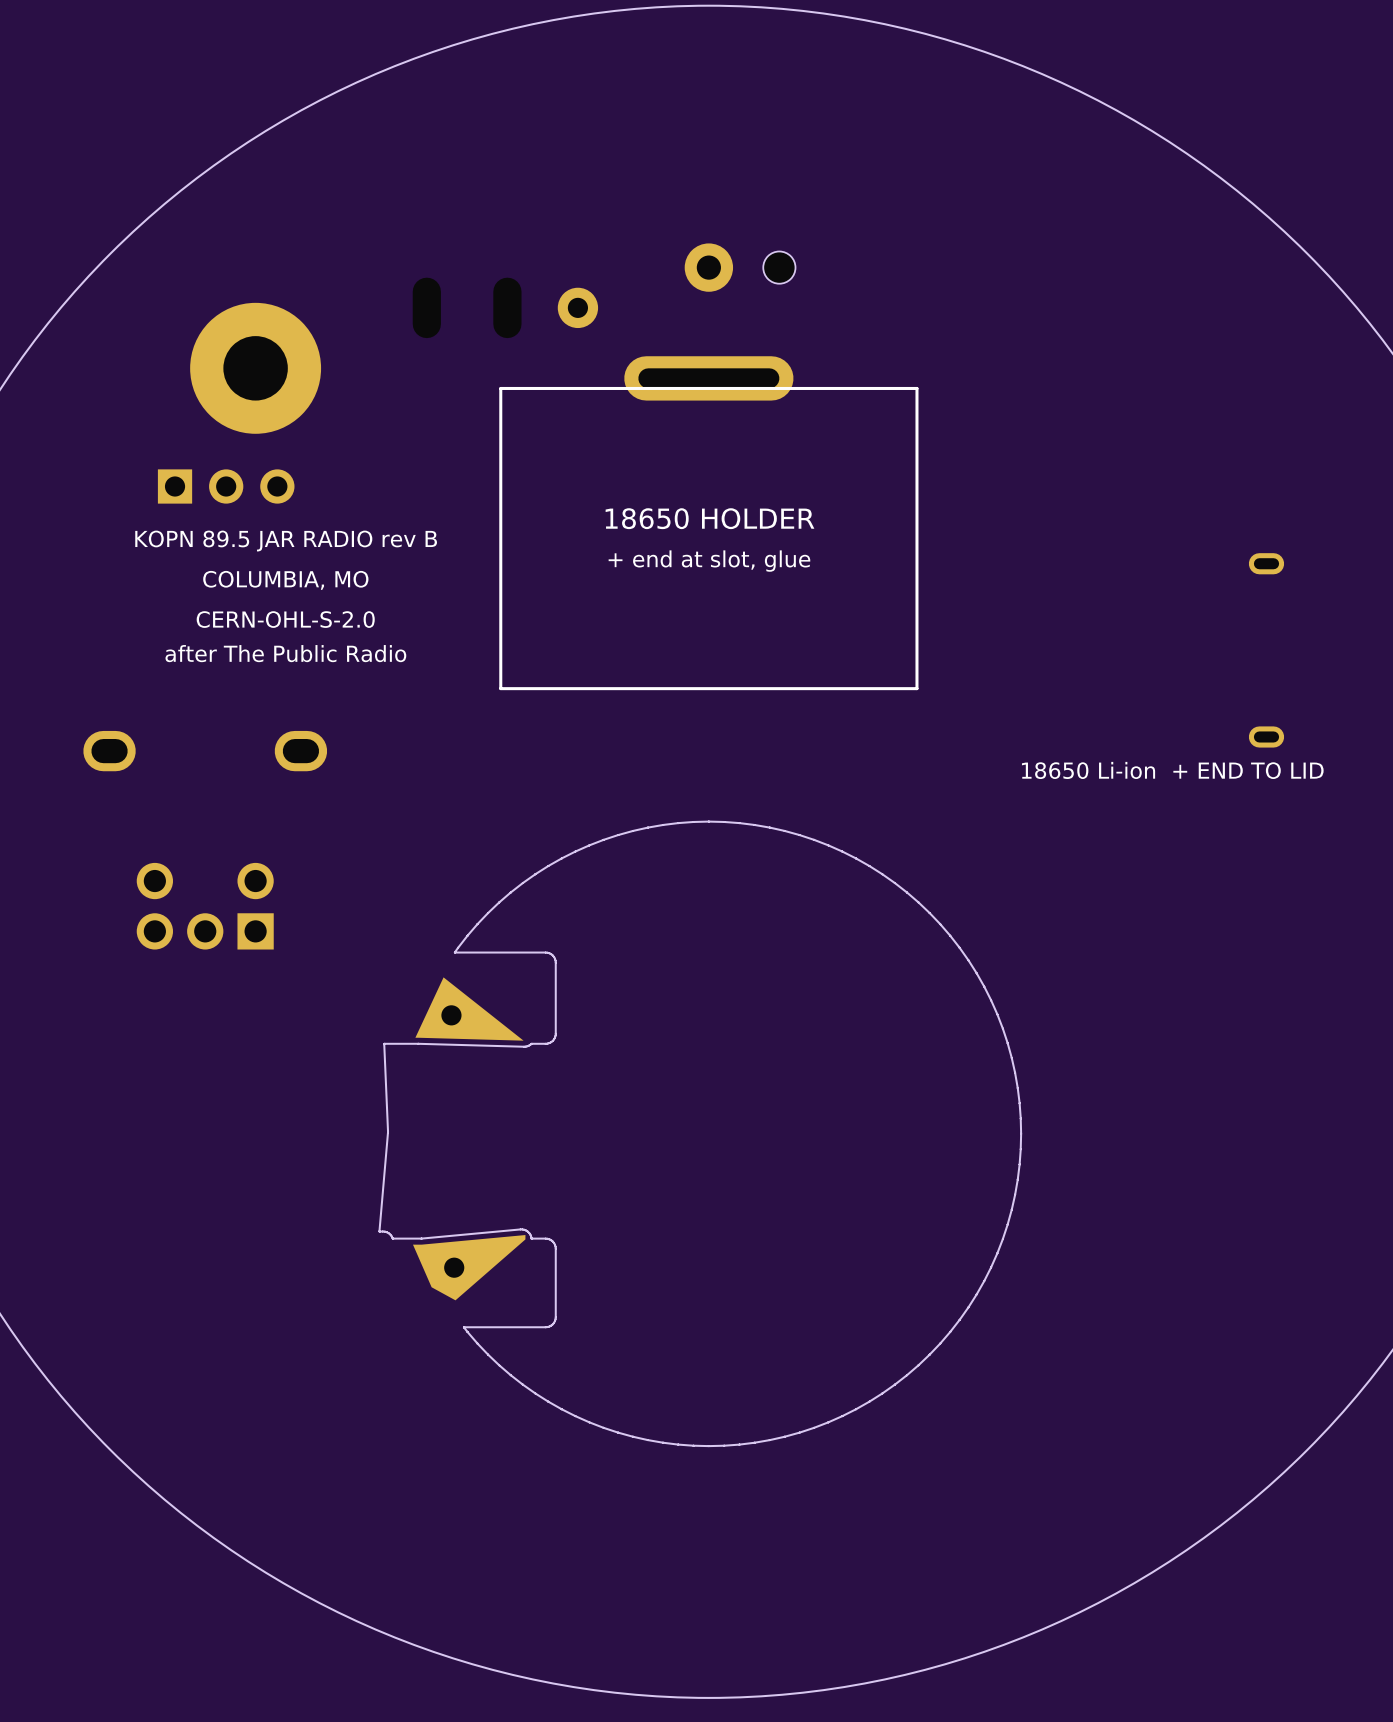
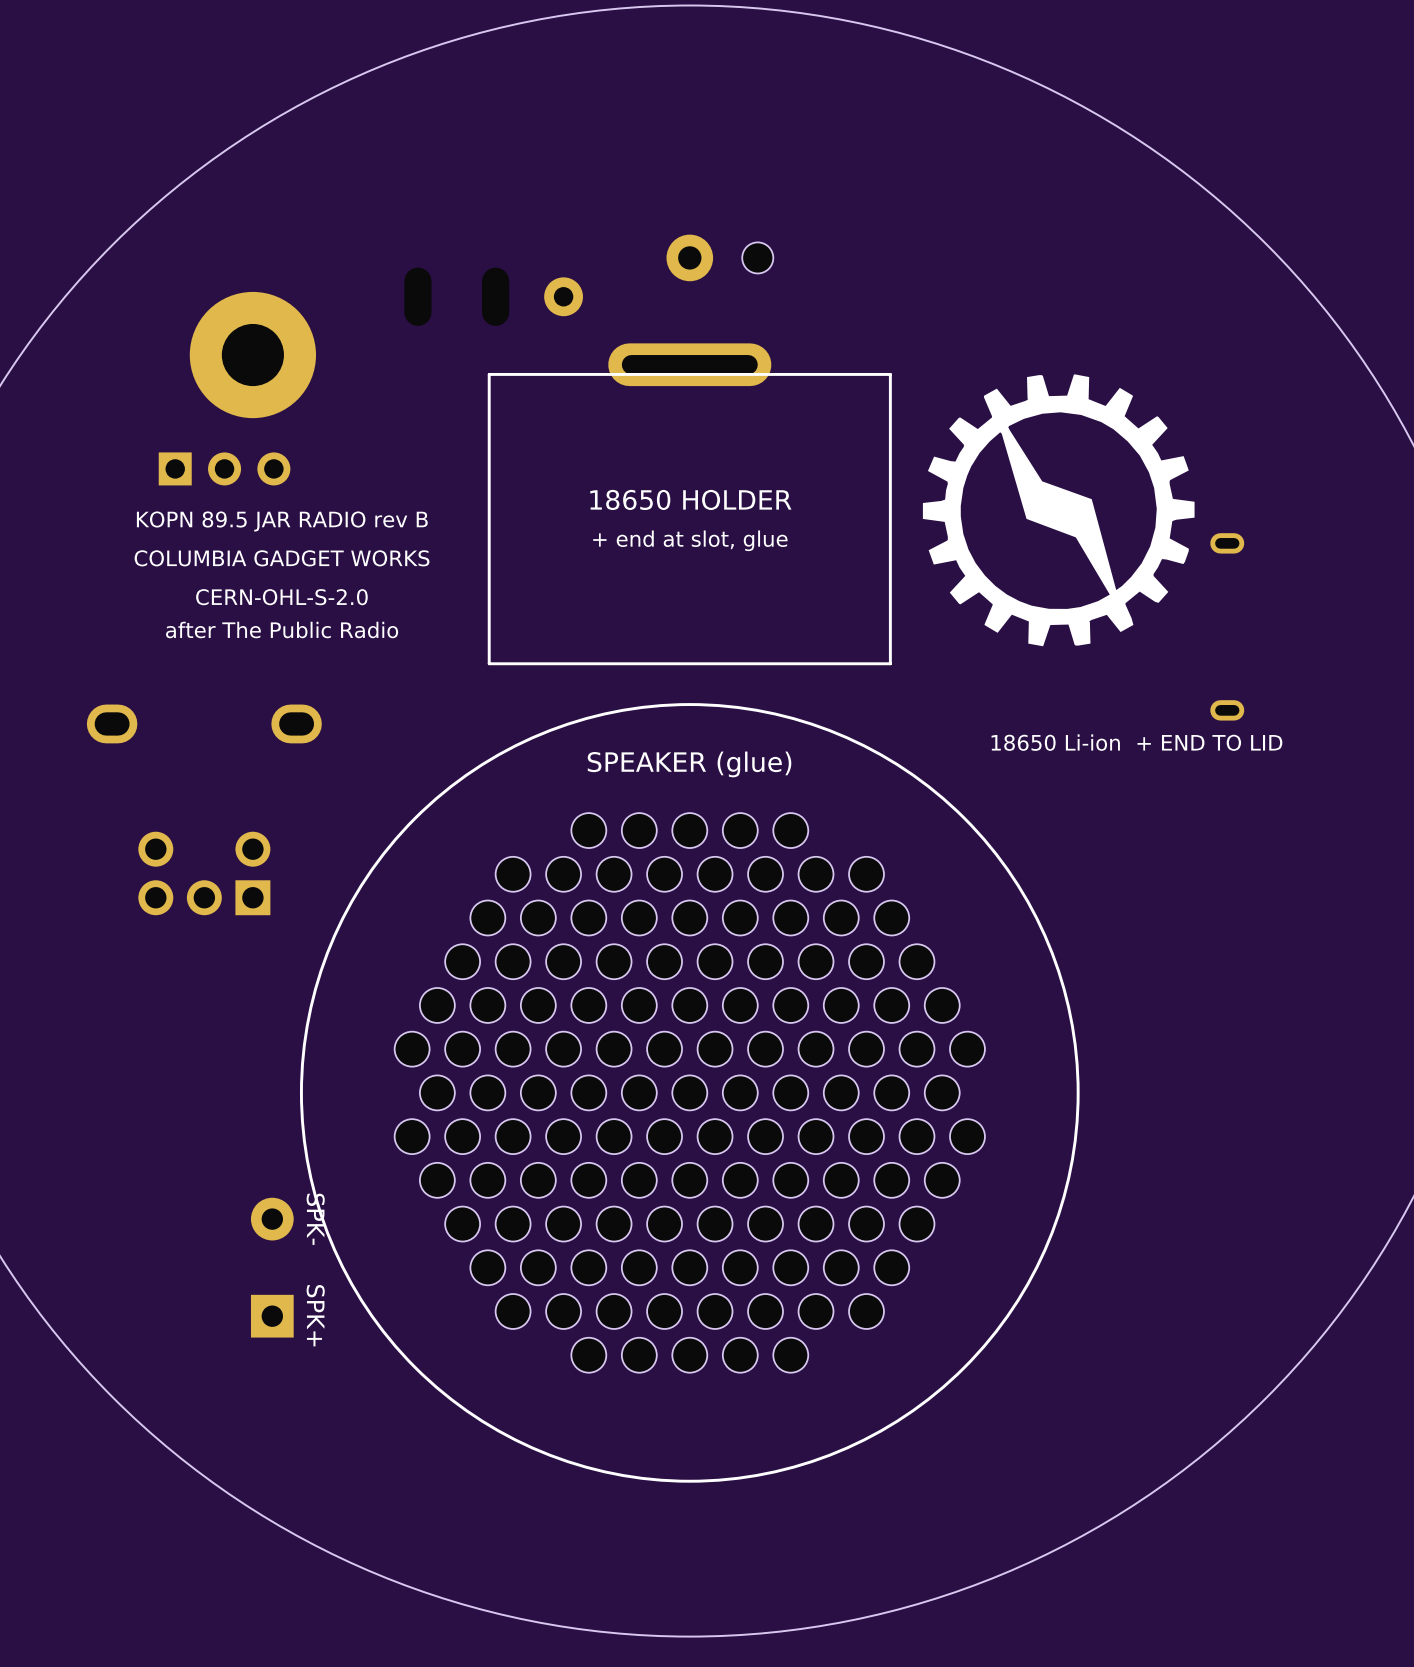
drawing: none -> [922, 374, 1195, 647]
text: COLUMBIA, MO (285, 580) -> COLUMBIA GADGET WORKS (282, 558)
drawing: none -> [299, 703, 1080, 1483]
part footprint: [378, 820, 1023, 1448] -> [394, 813, 985, 1373]
part: none -> (272, 1267)

